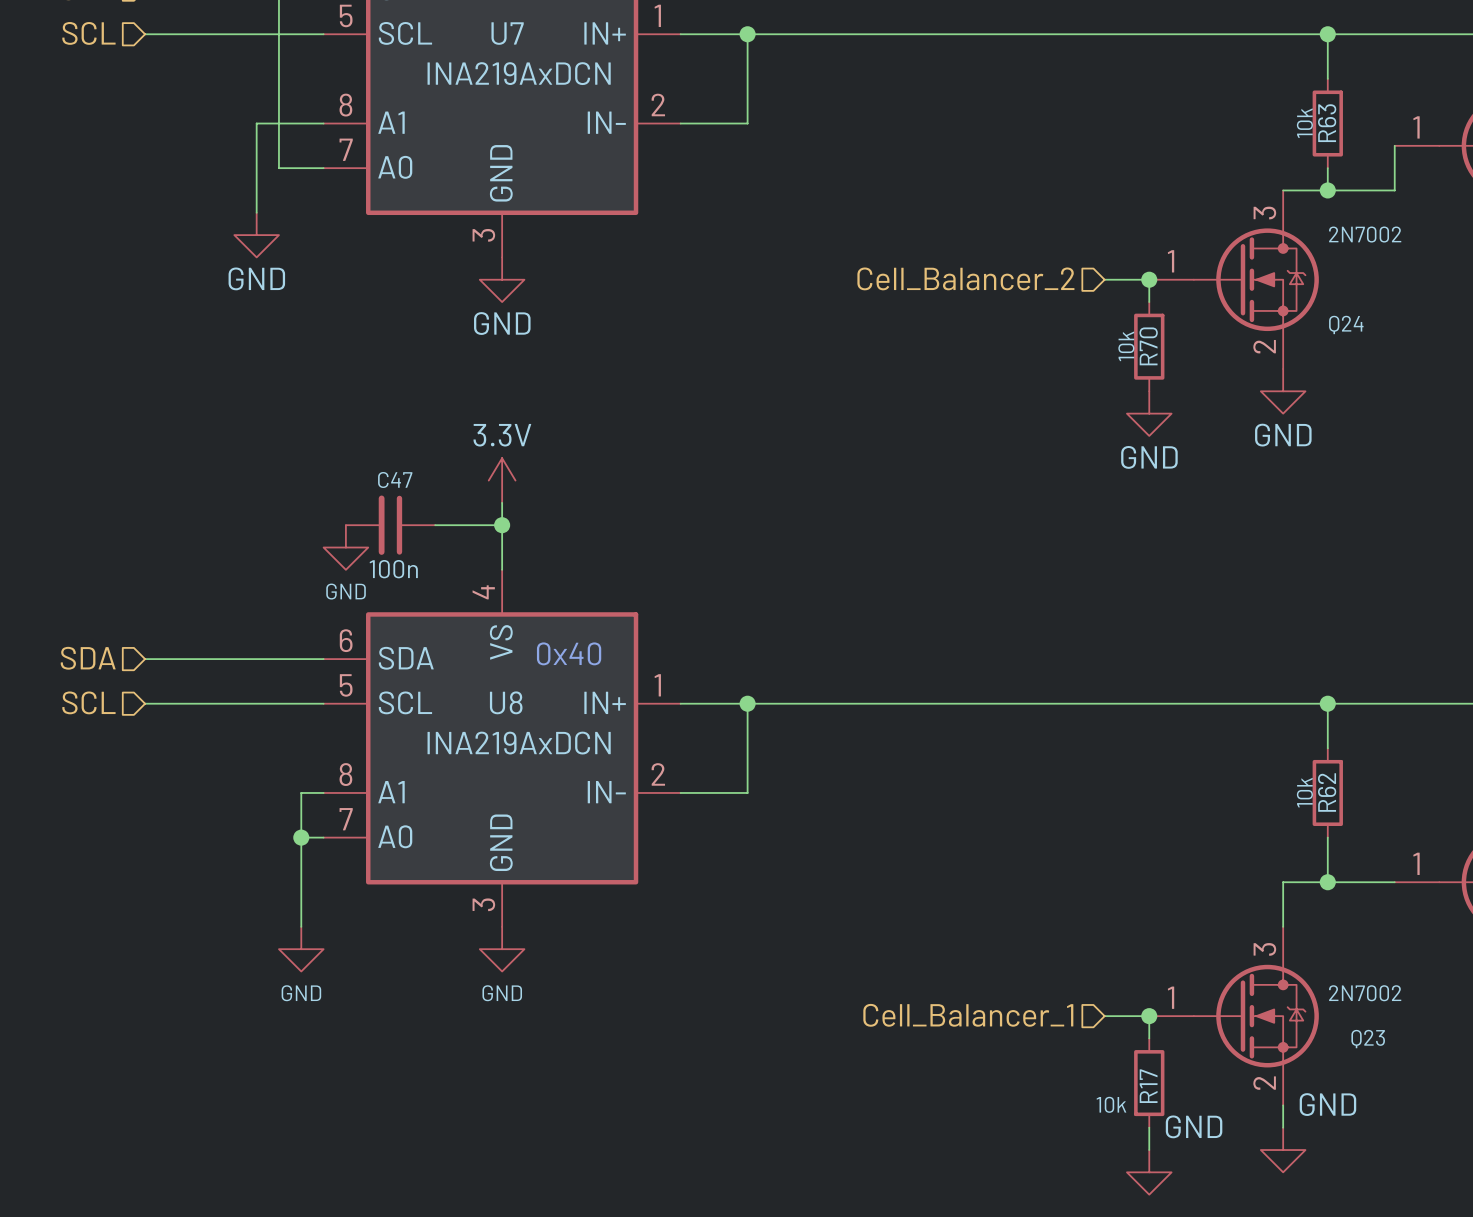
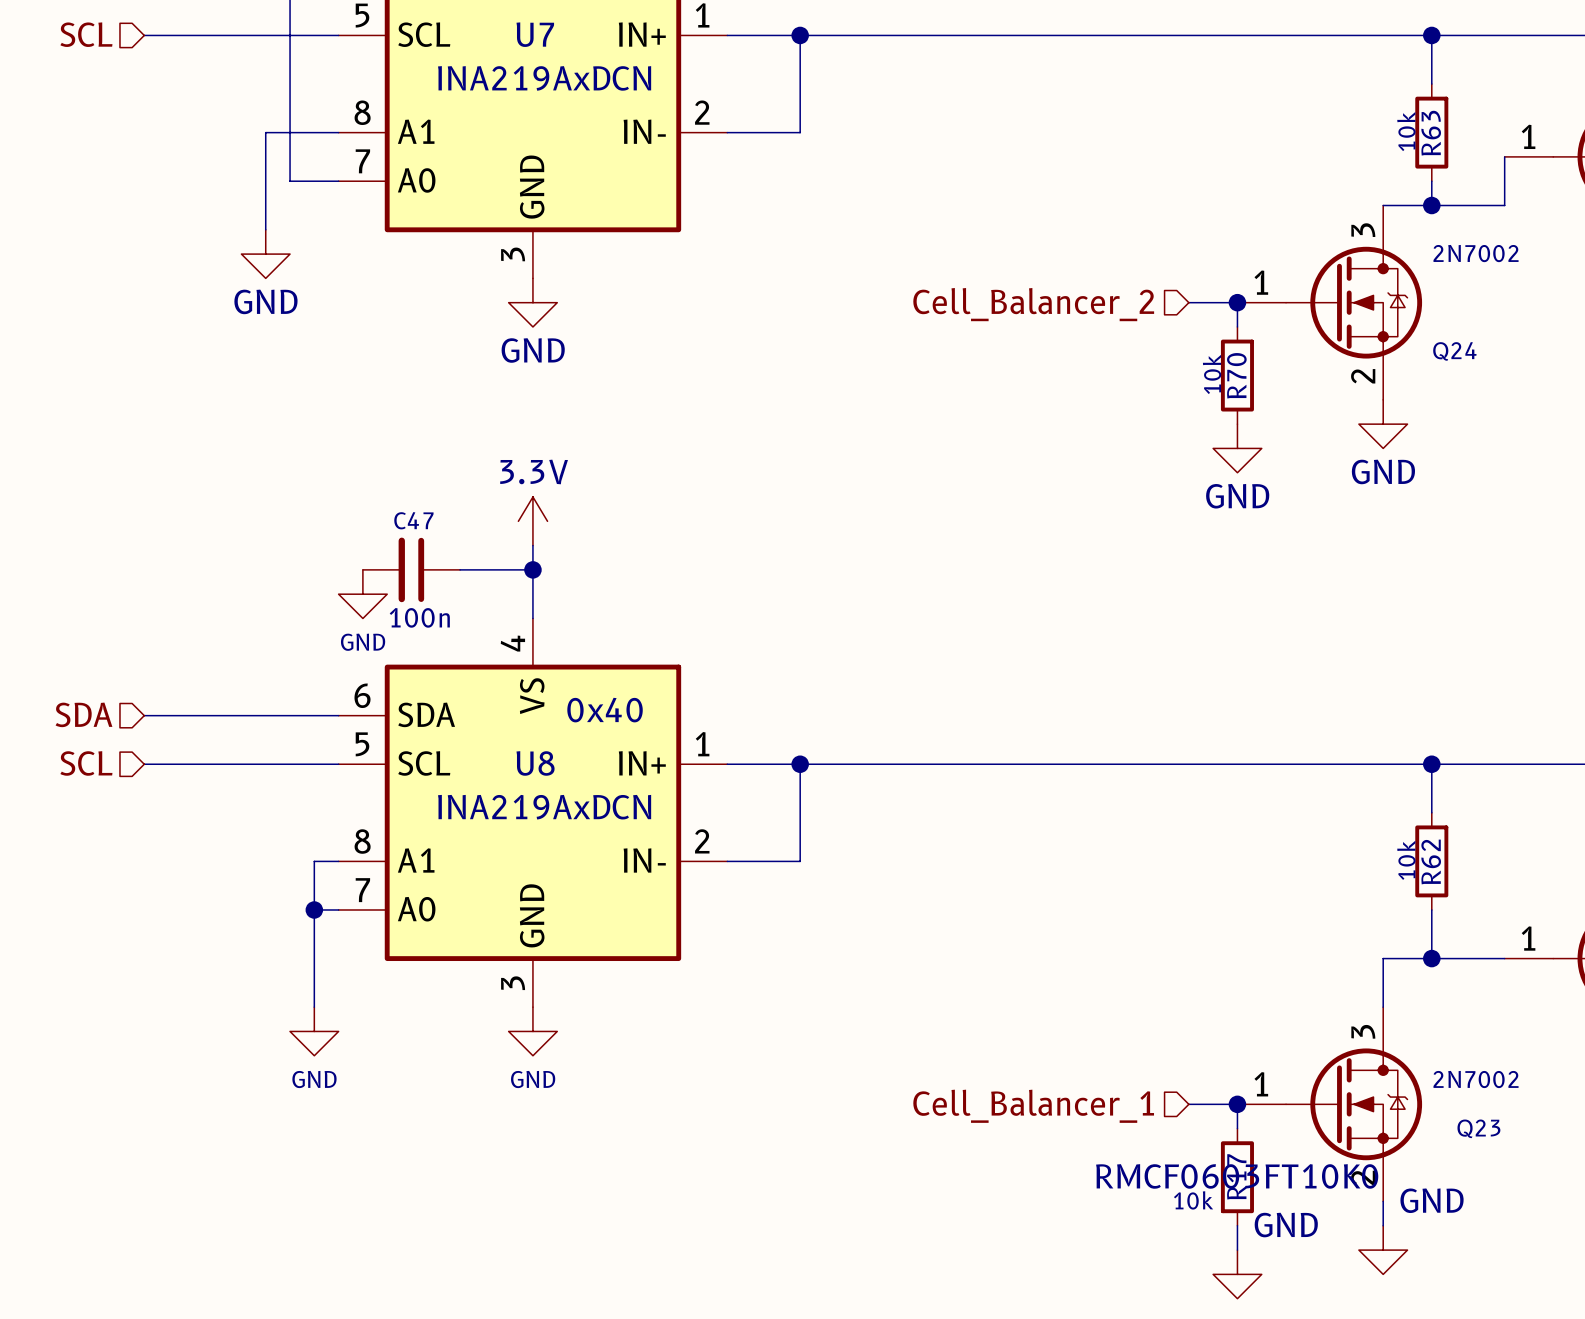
R17 text: none -> RMCF0603FT10K0 (1237, 1176)

